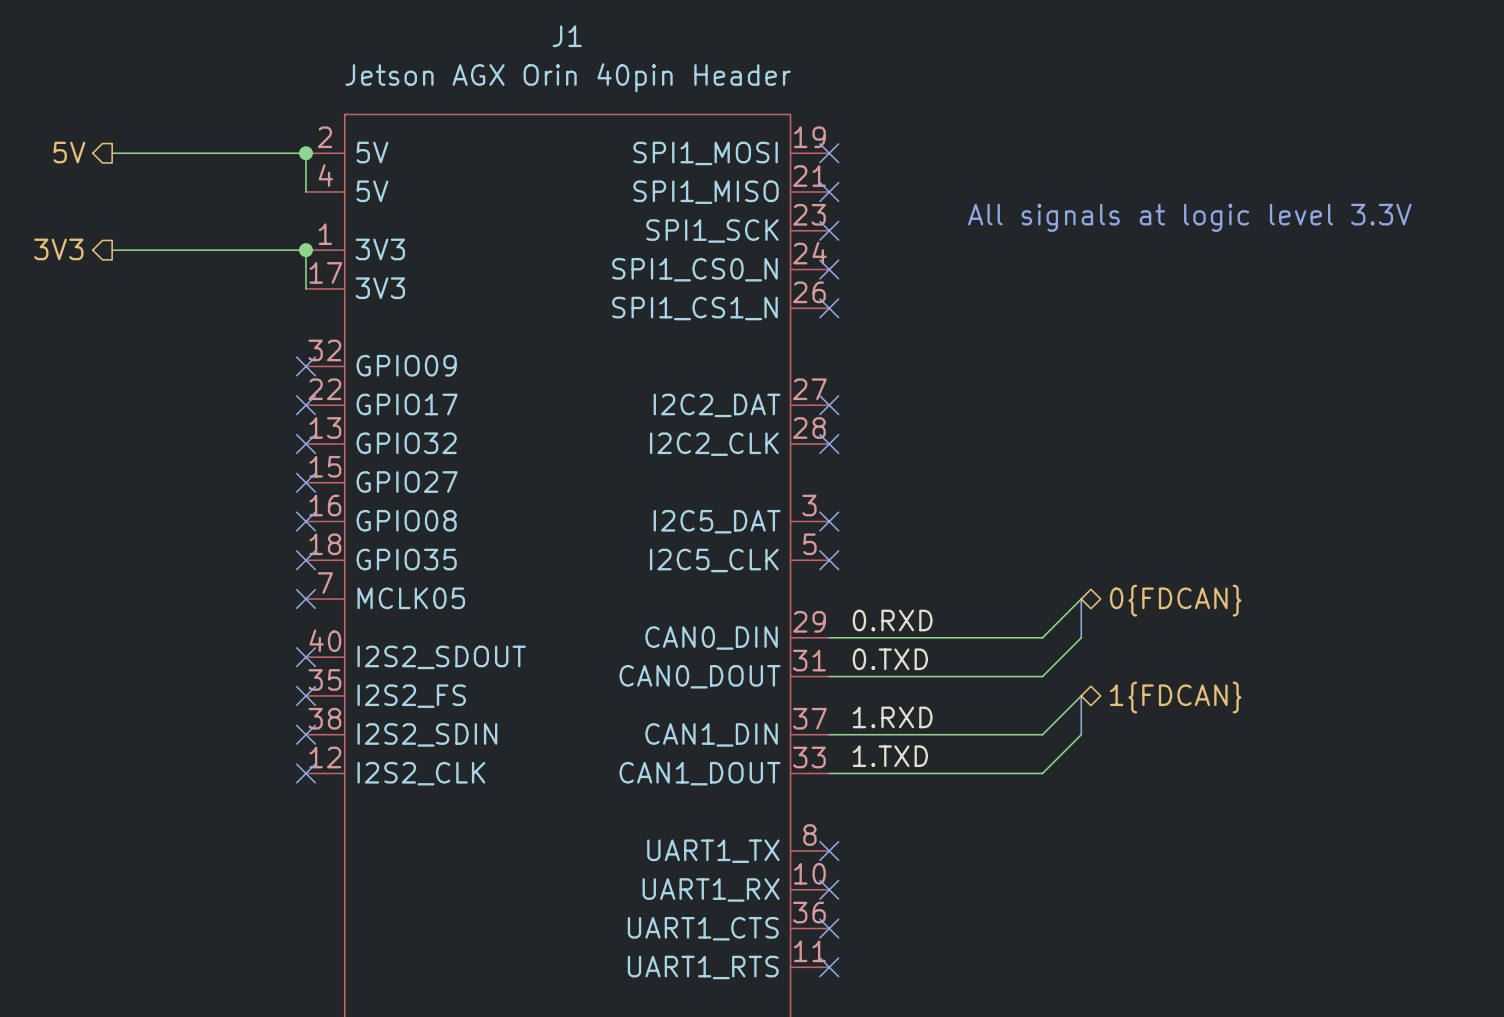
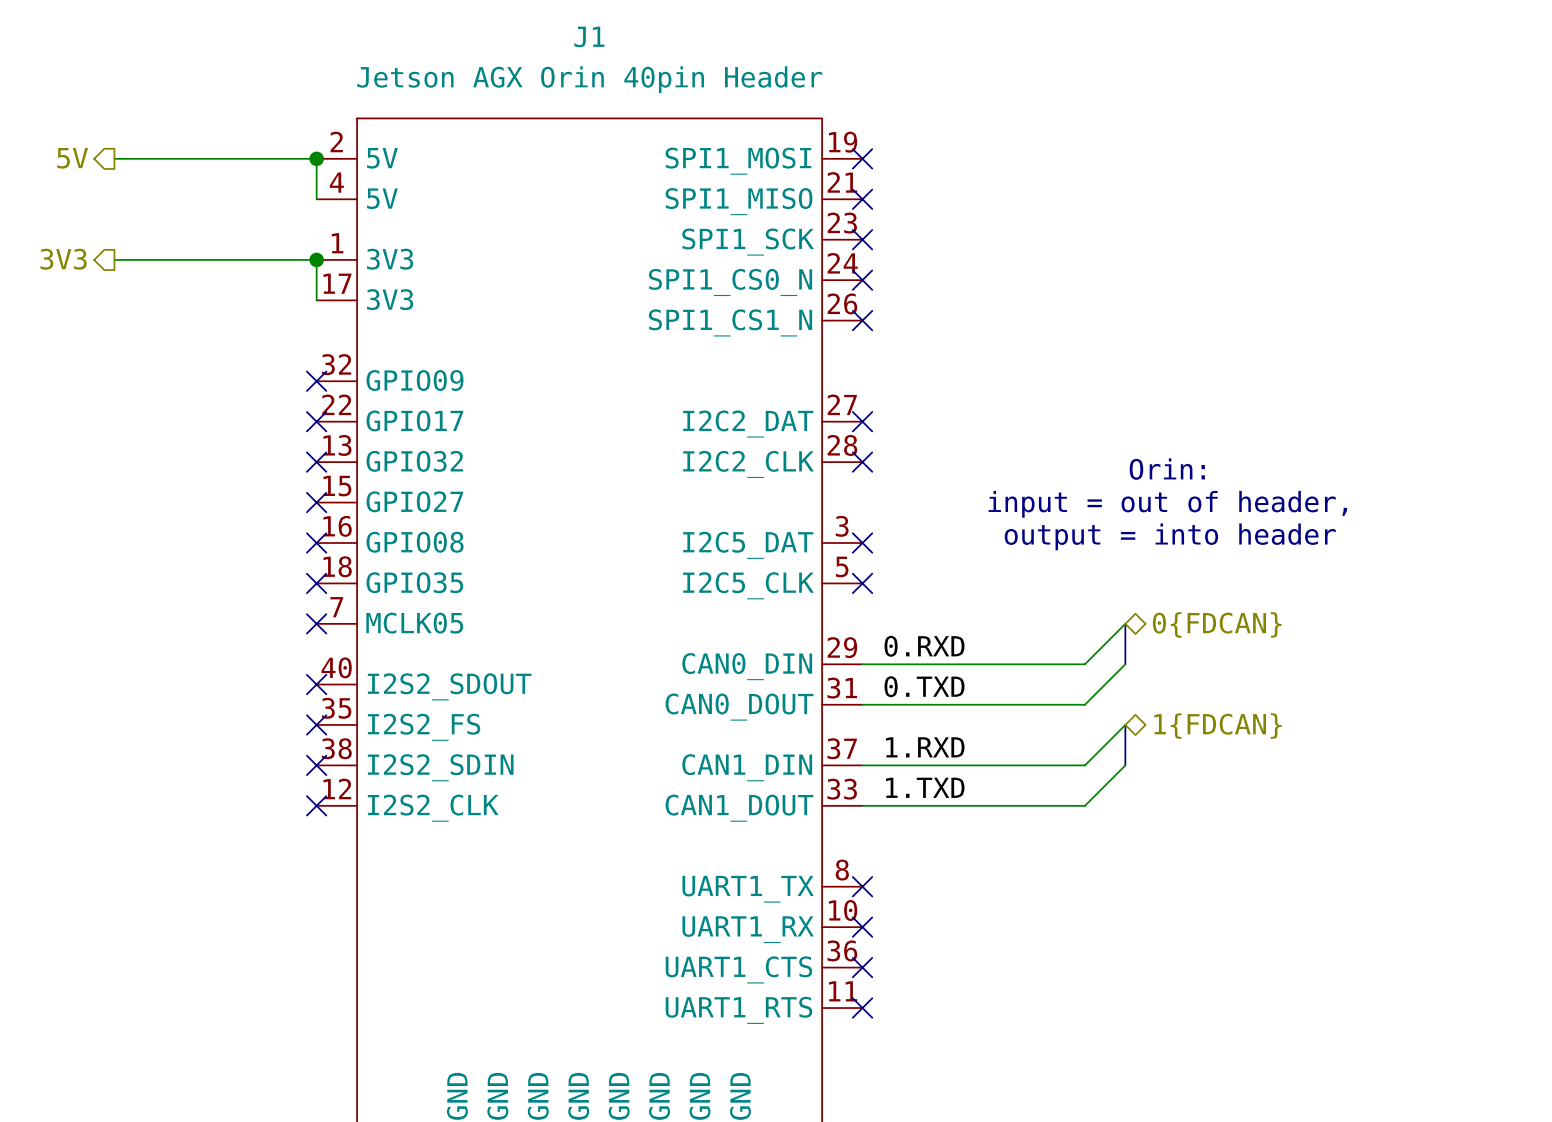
text: All signals at logic level 3.3V (1189, 217) -> none
text: none -> Orin: (1167, 469)
text: none -> input = out of header, (1167, 504)
text: none -> output = into header (1170, 536)

